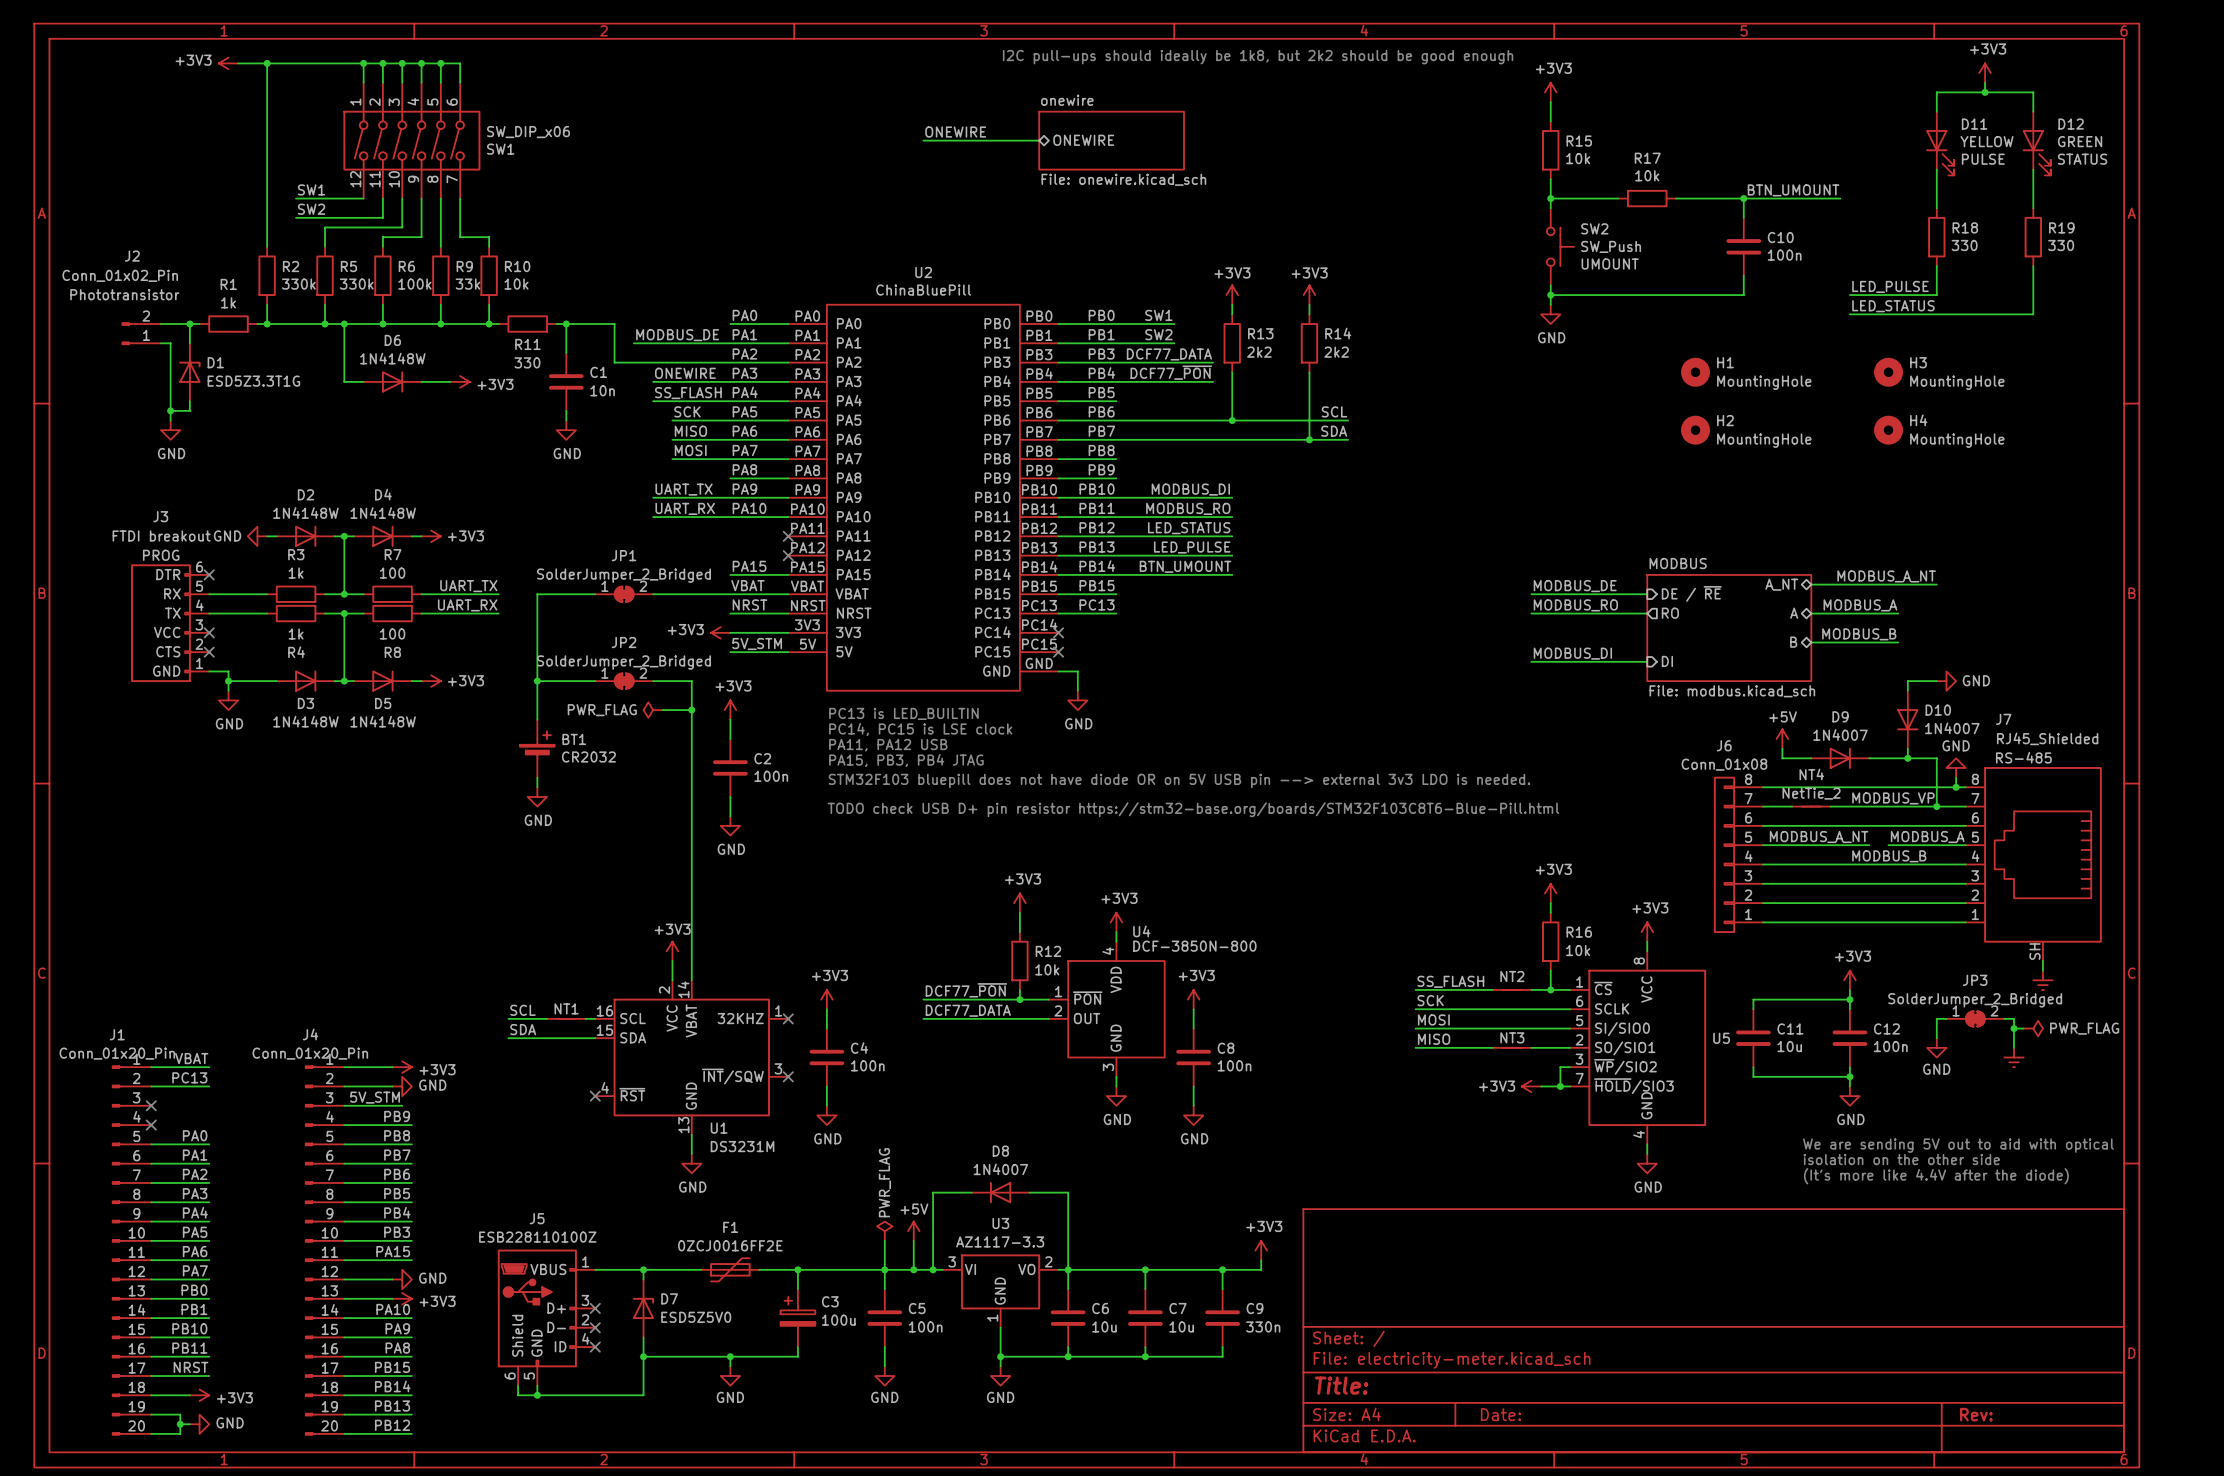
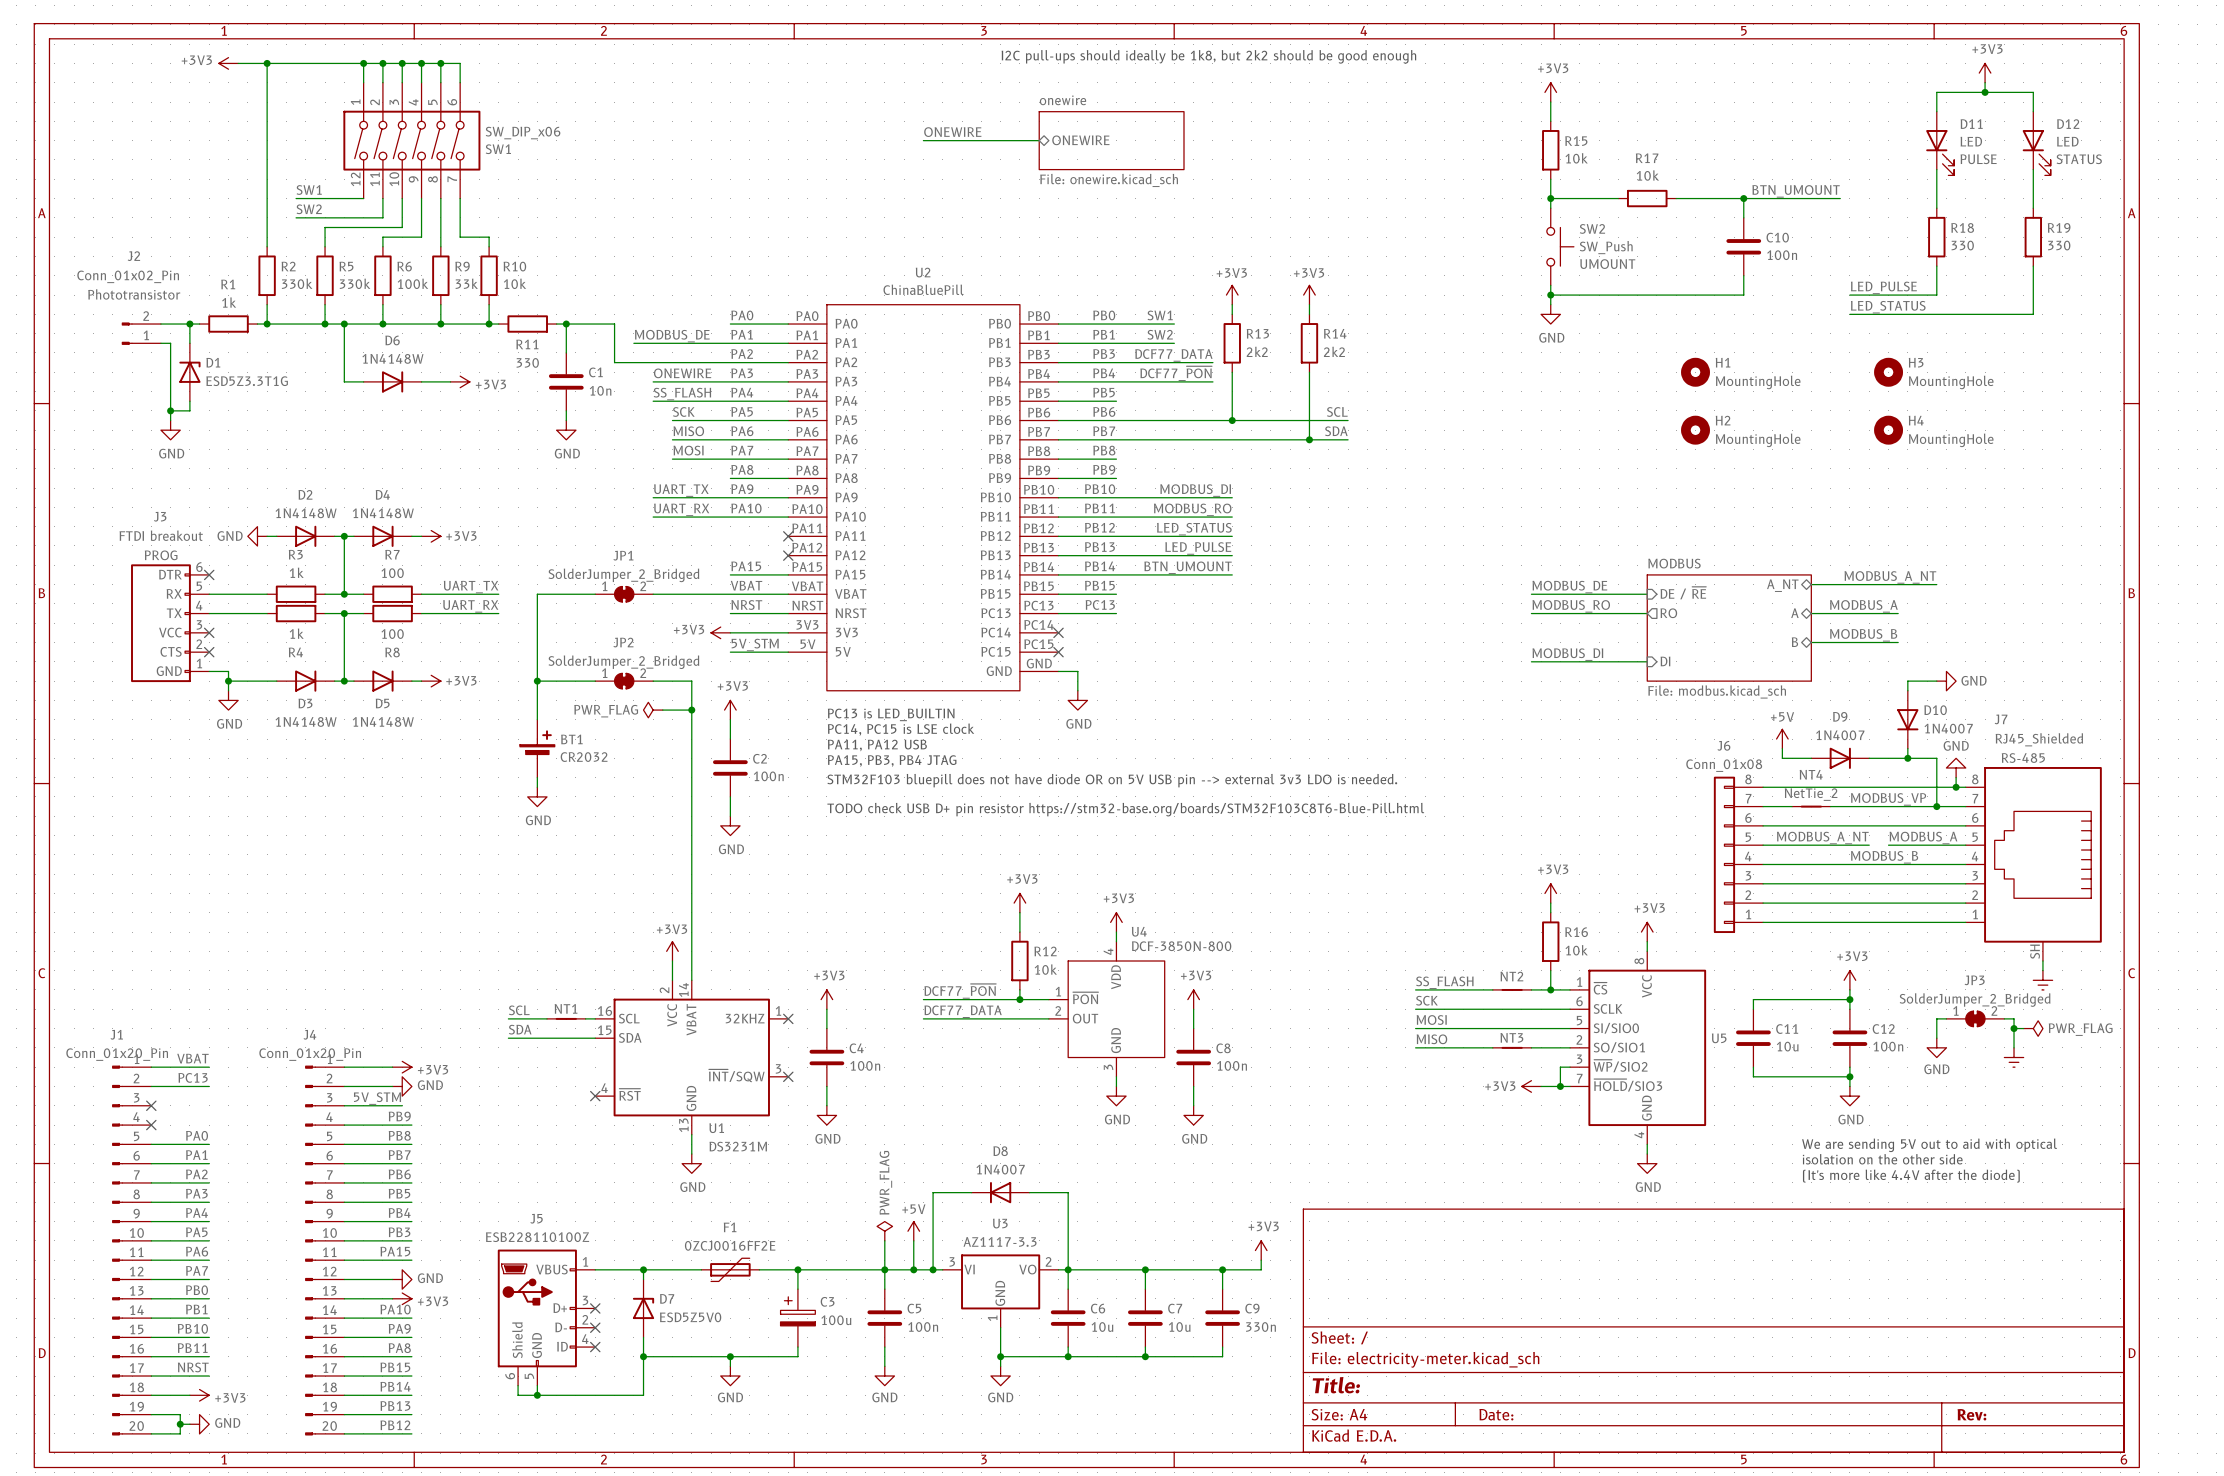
D11 value: YELLOW (1986, 141) -> LED (1971, 141)
D12 value: GREEN (2080, 141) -> LED (2067, 141)

